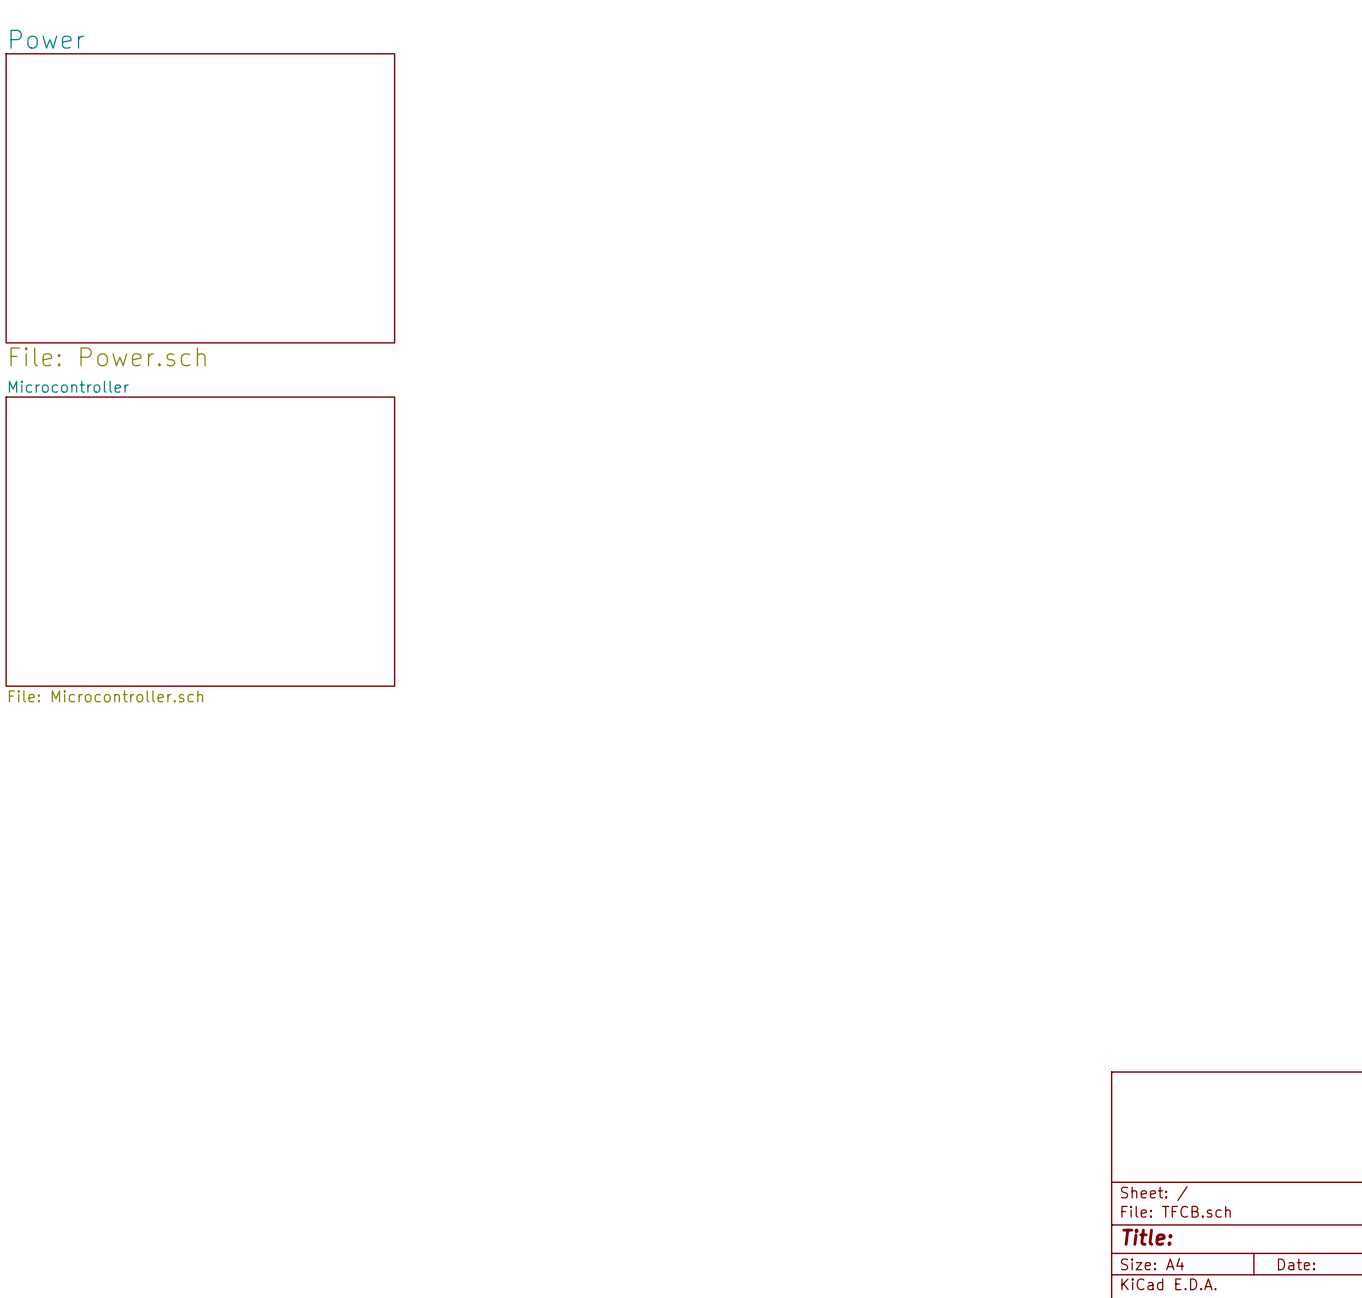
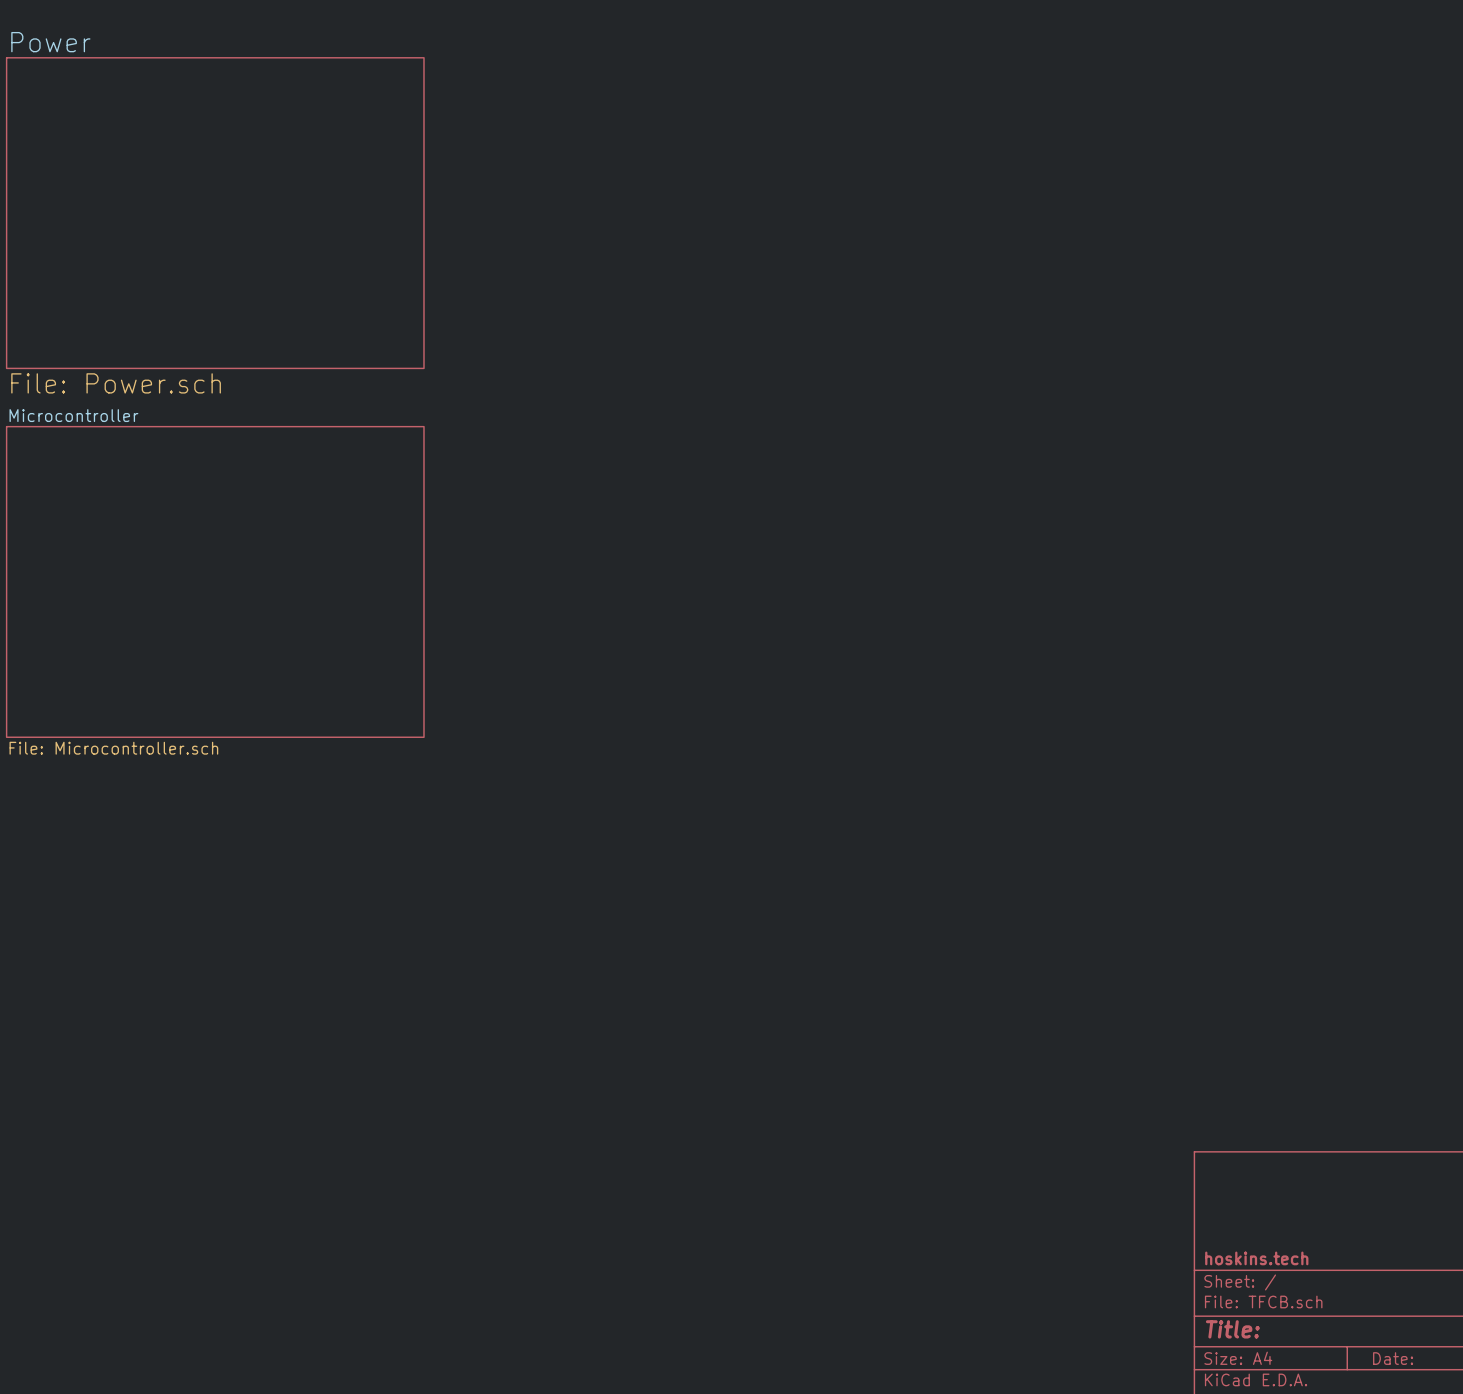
title block: none -> hoskins.tech (1256, 1258)

